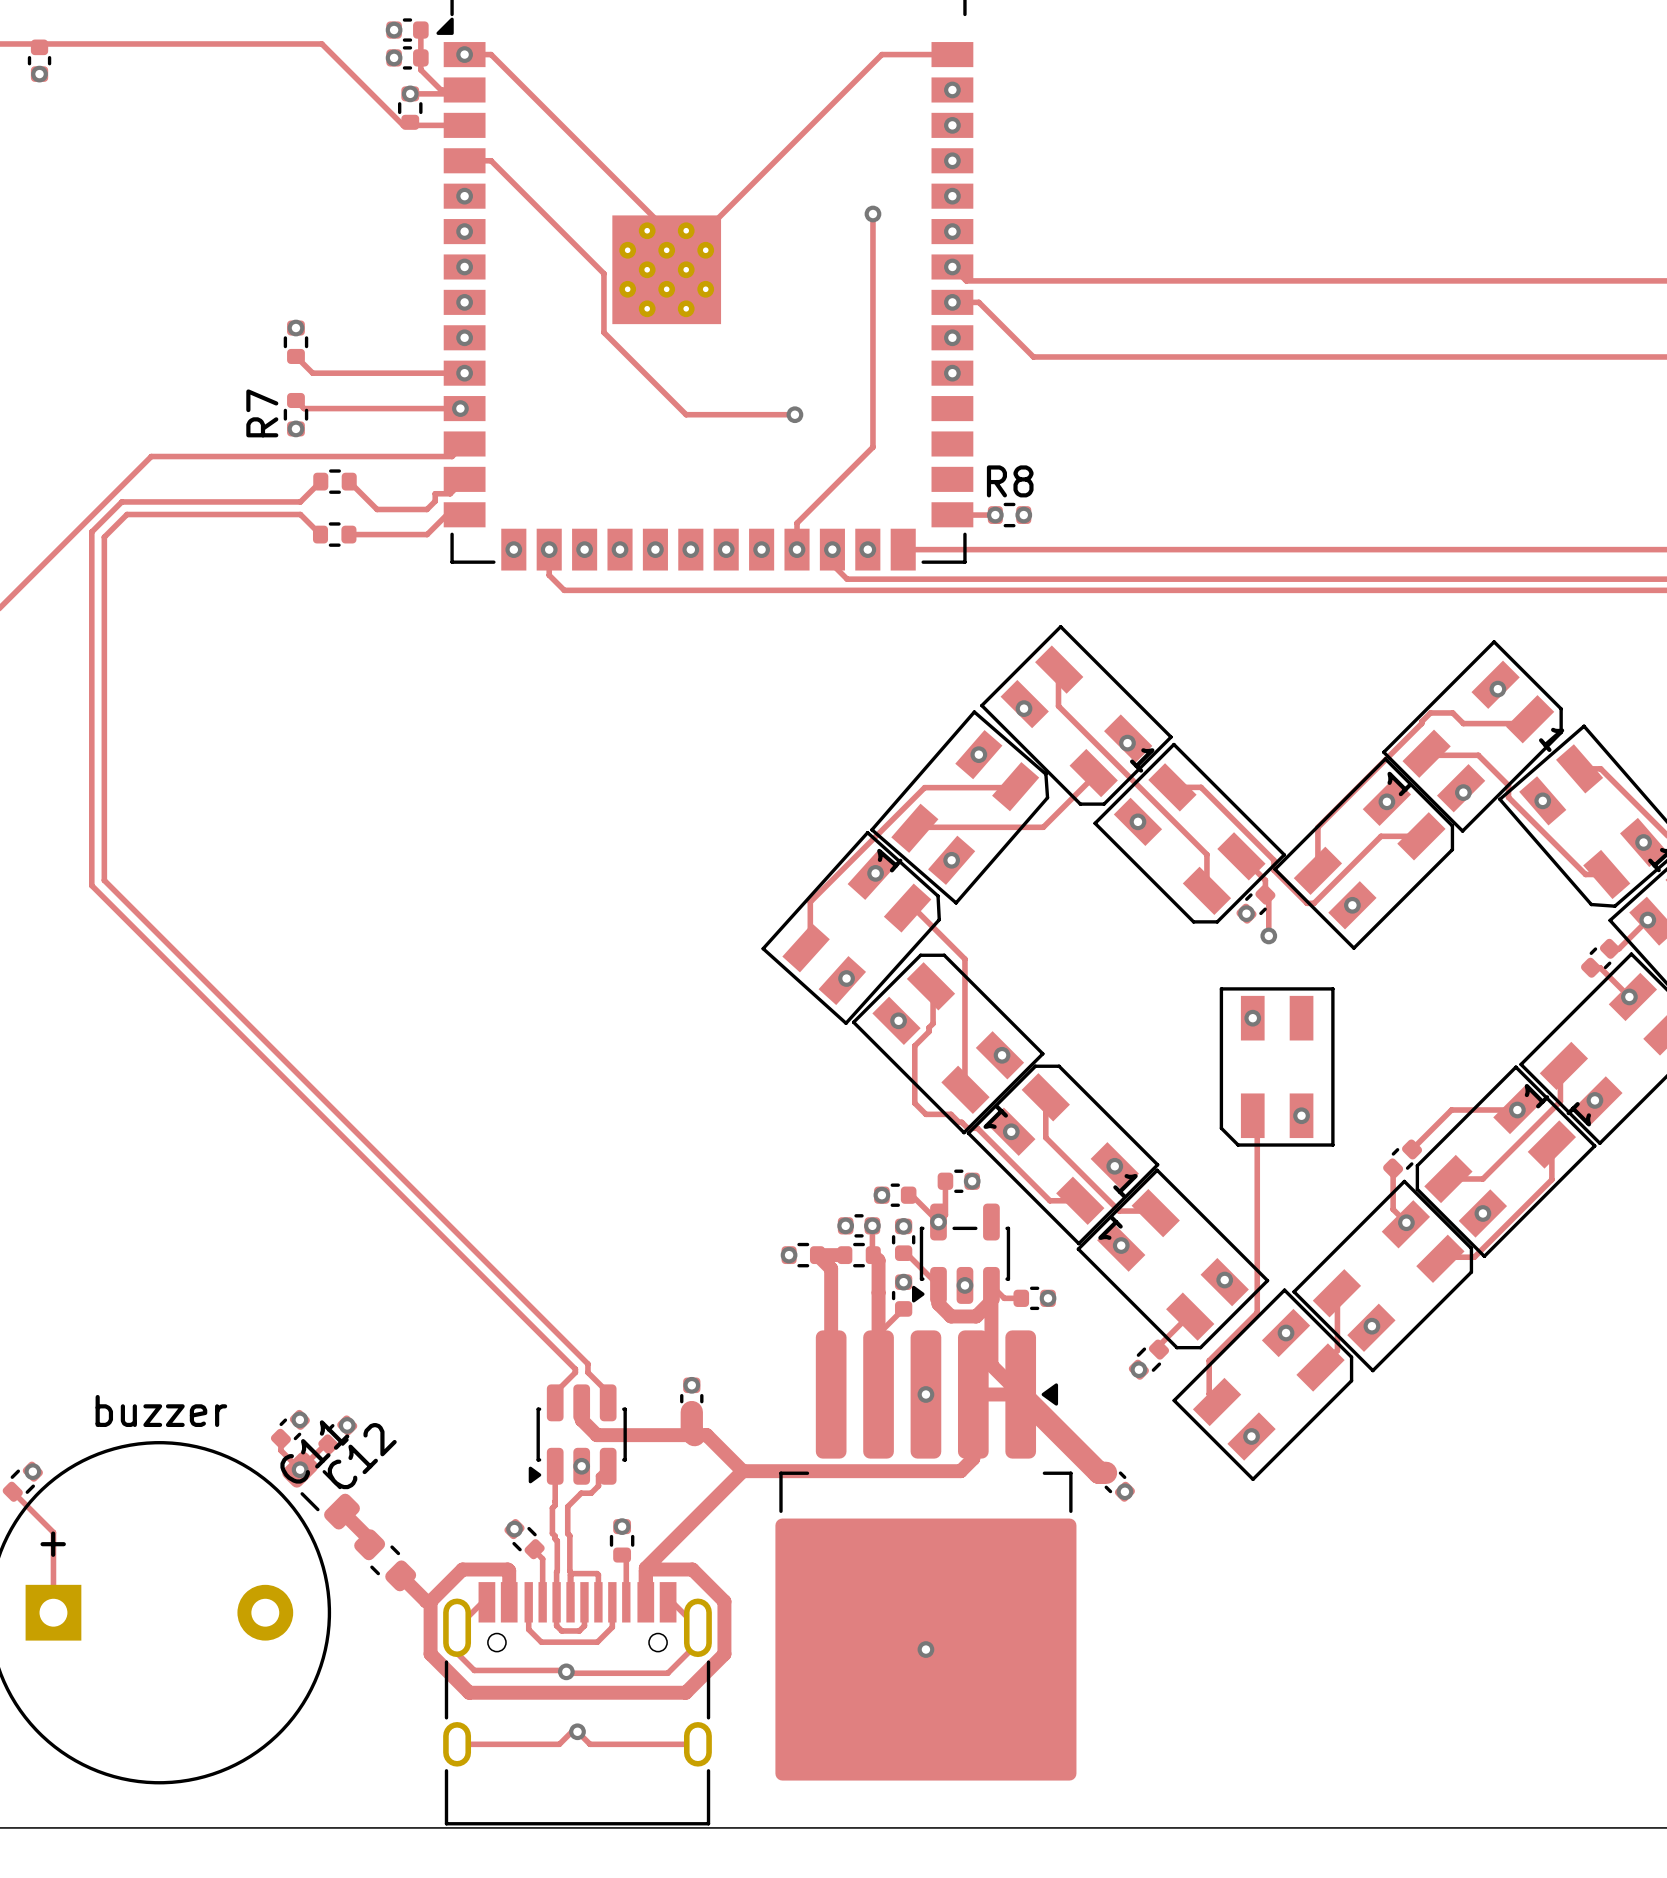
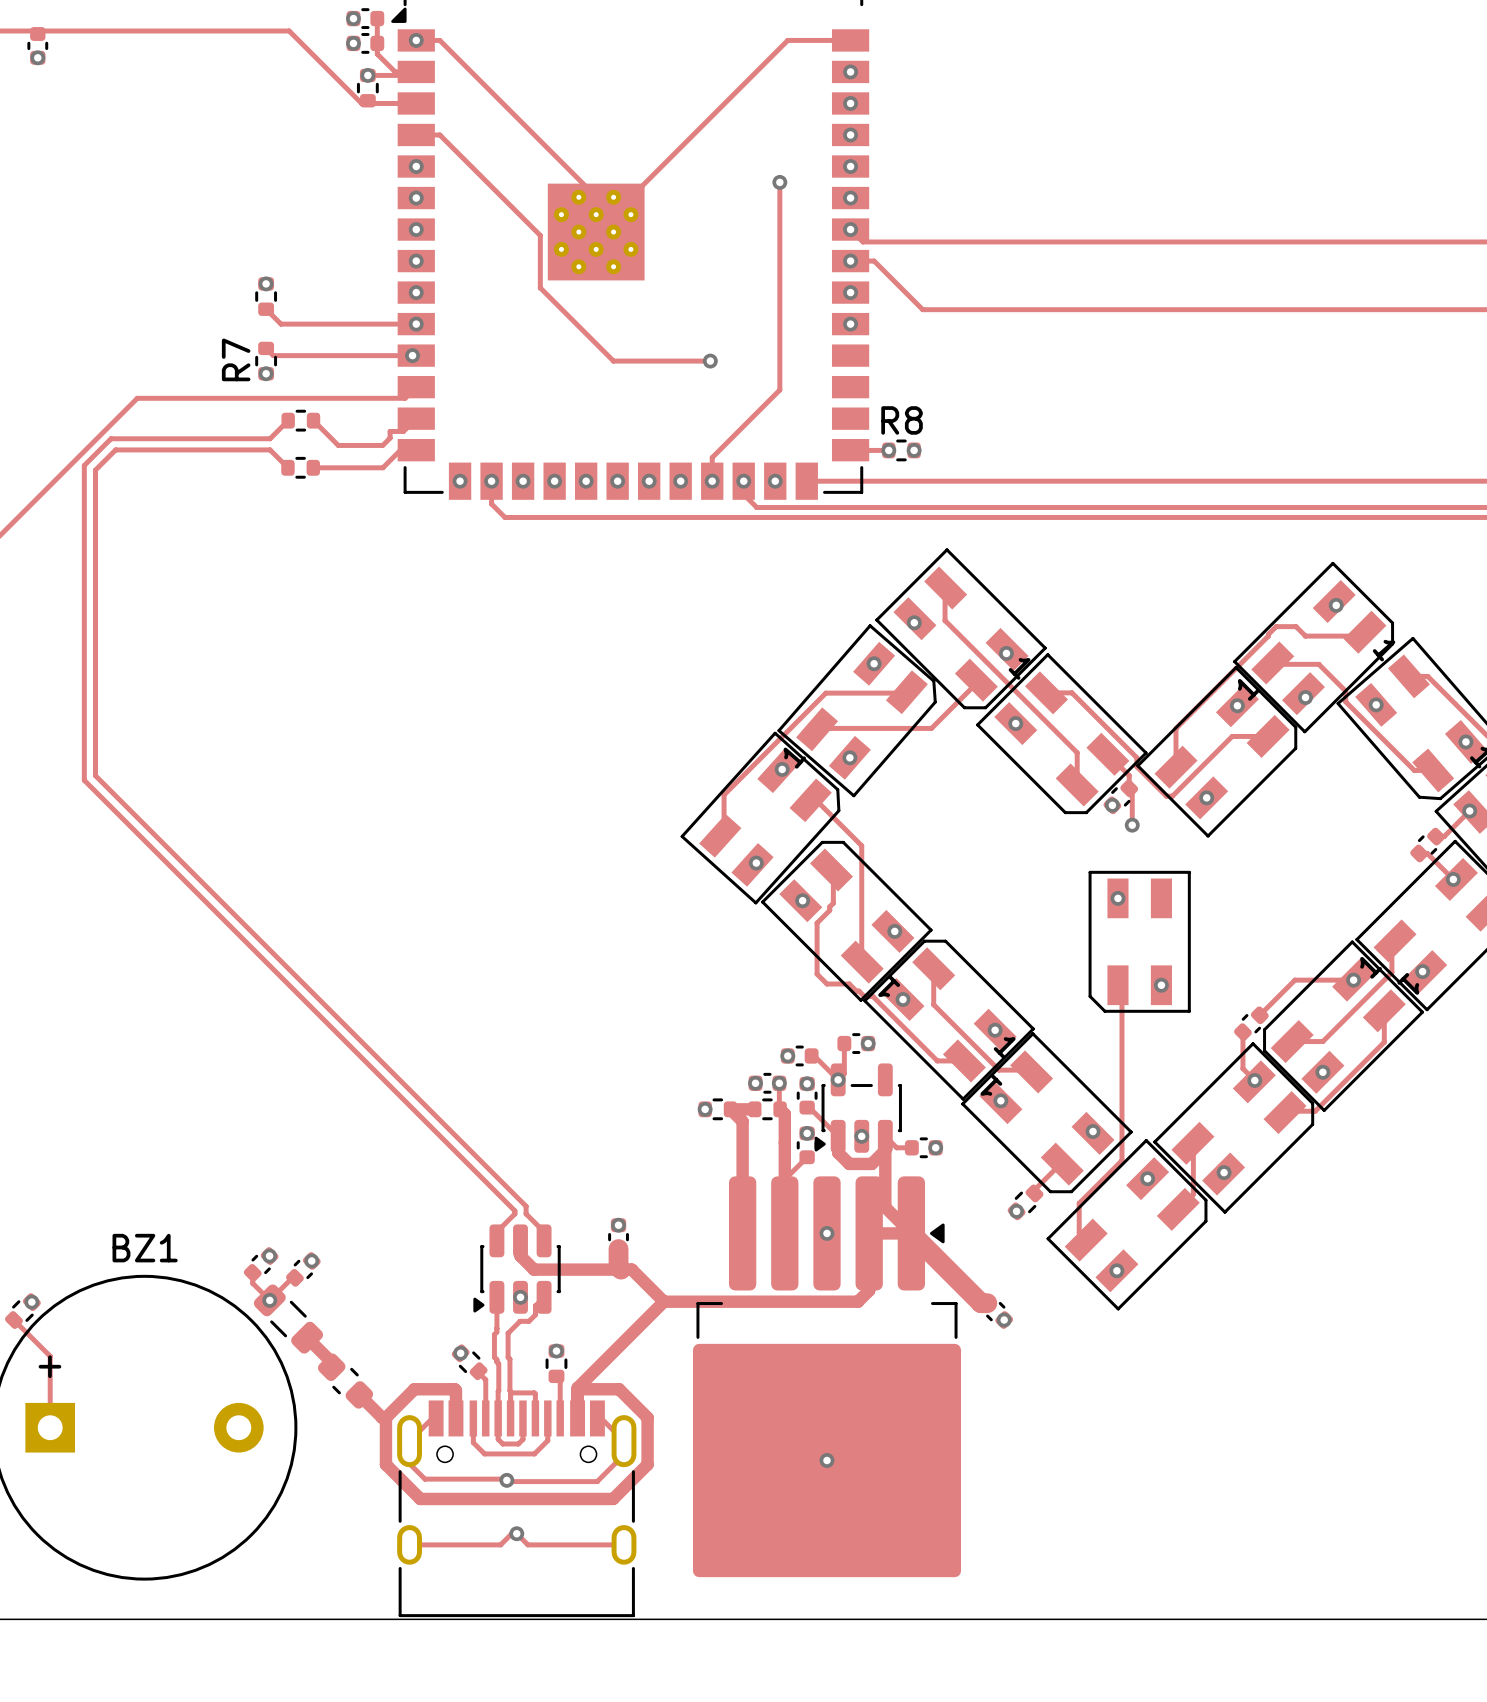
buzzer name: buzzer (161, 1410) -> BZ1 (145, 1248)
C11 name: C11 (314, 1451) -> none
C12 name: C12 (362, 1456) -> none

